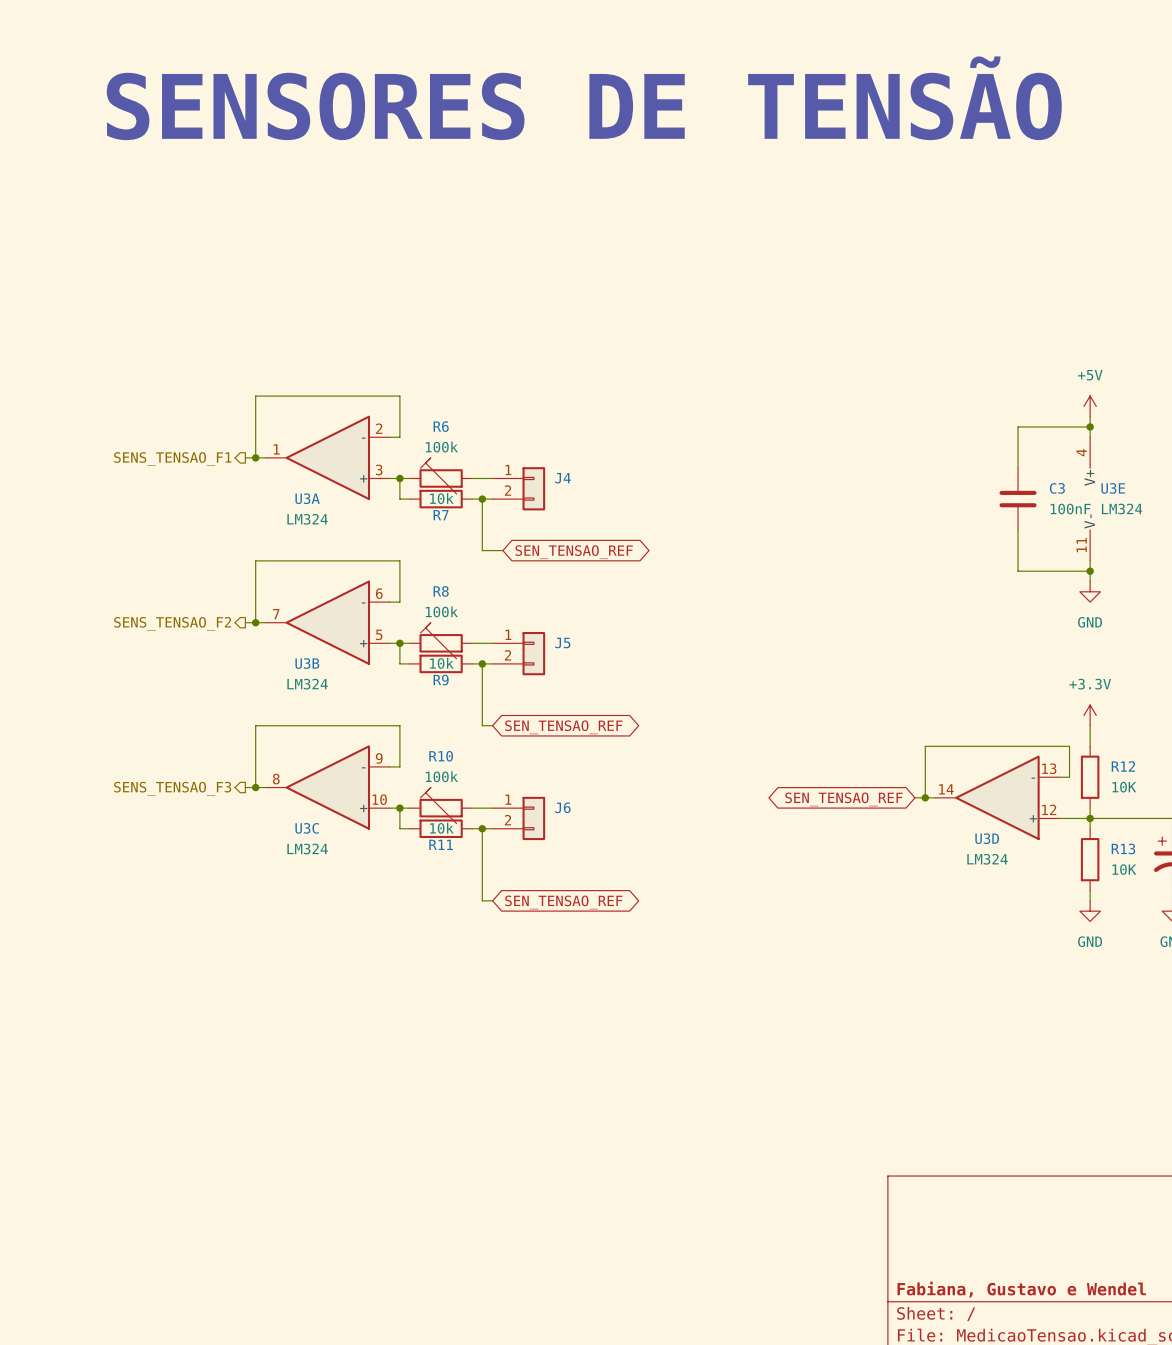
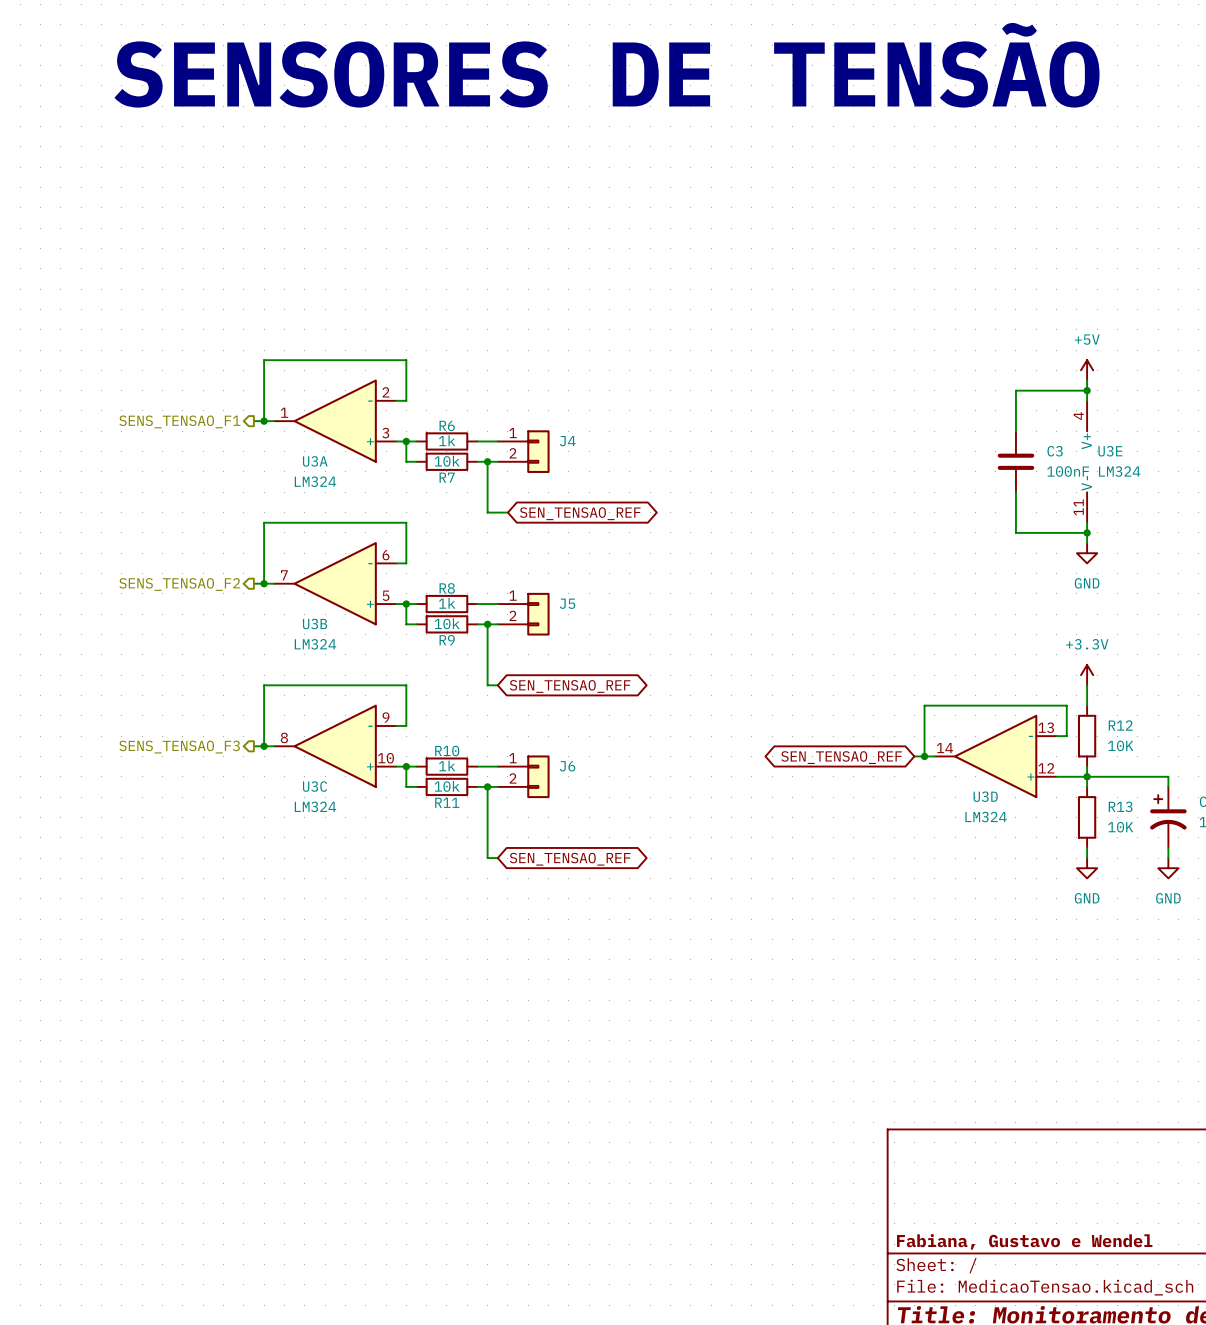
R6 name position: R6 (441, 426) -> R6 (447, 425)
R6 value: 100k (441, 447) -> 1k (447, 440)
R6 symbol: [410, 457, 473, 494] -> [416, 432, 478, 451]
R8 name position: R8 (441, 591) -> R8 (447, 588)
R8 value: 100k (441, 611) -> 1k (447, 603)
R8 symbol: [410, 622, 473, 659] -> [416, 594, 478, 614]
R10 name position: R10 (441, 756) -> R10 (447, 750)
R10 value: 100k (441, 776) -> 1k (447, 765)
R10 symbol: [410, 787, 473, 824] -> [416, 757, 478, 776]

